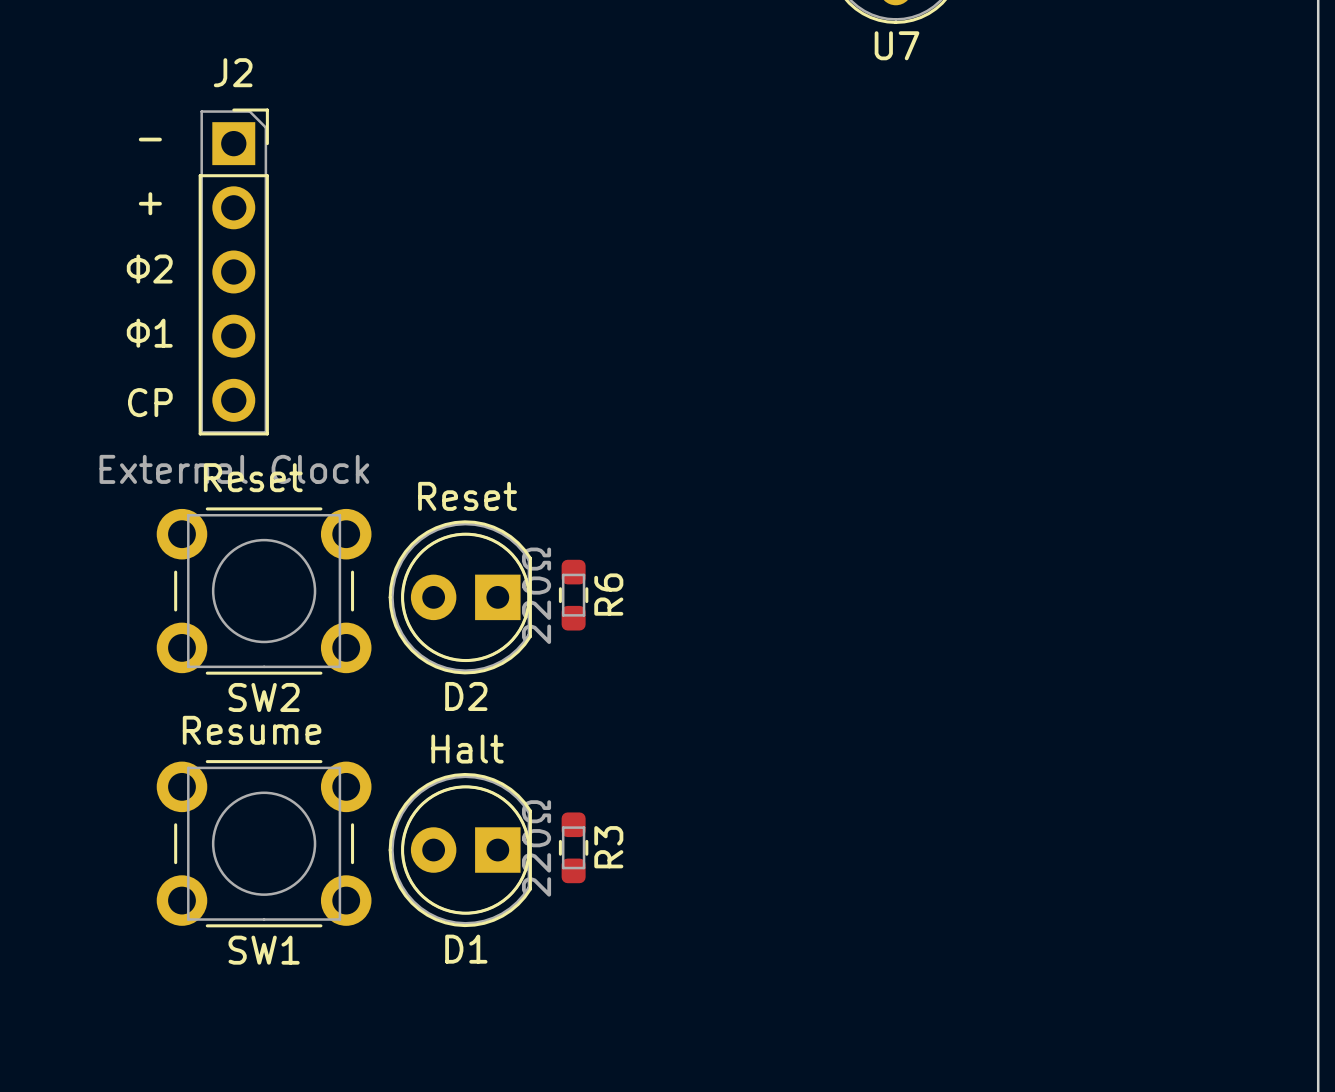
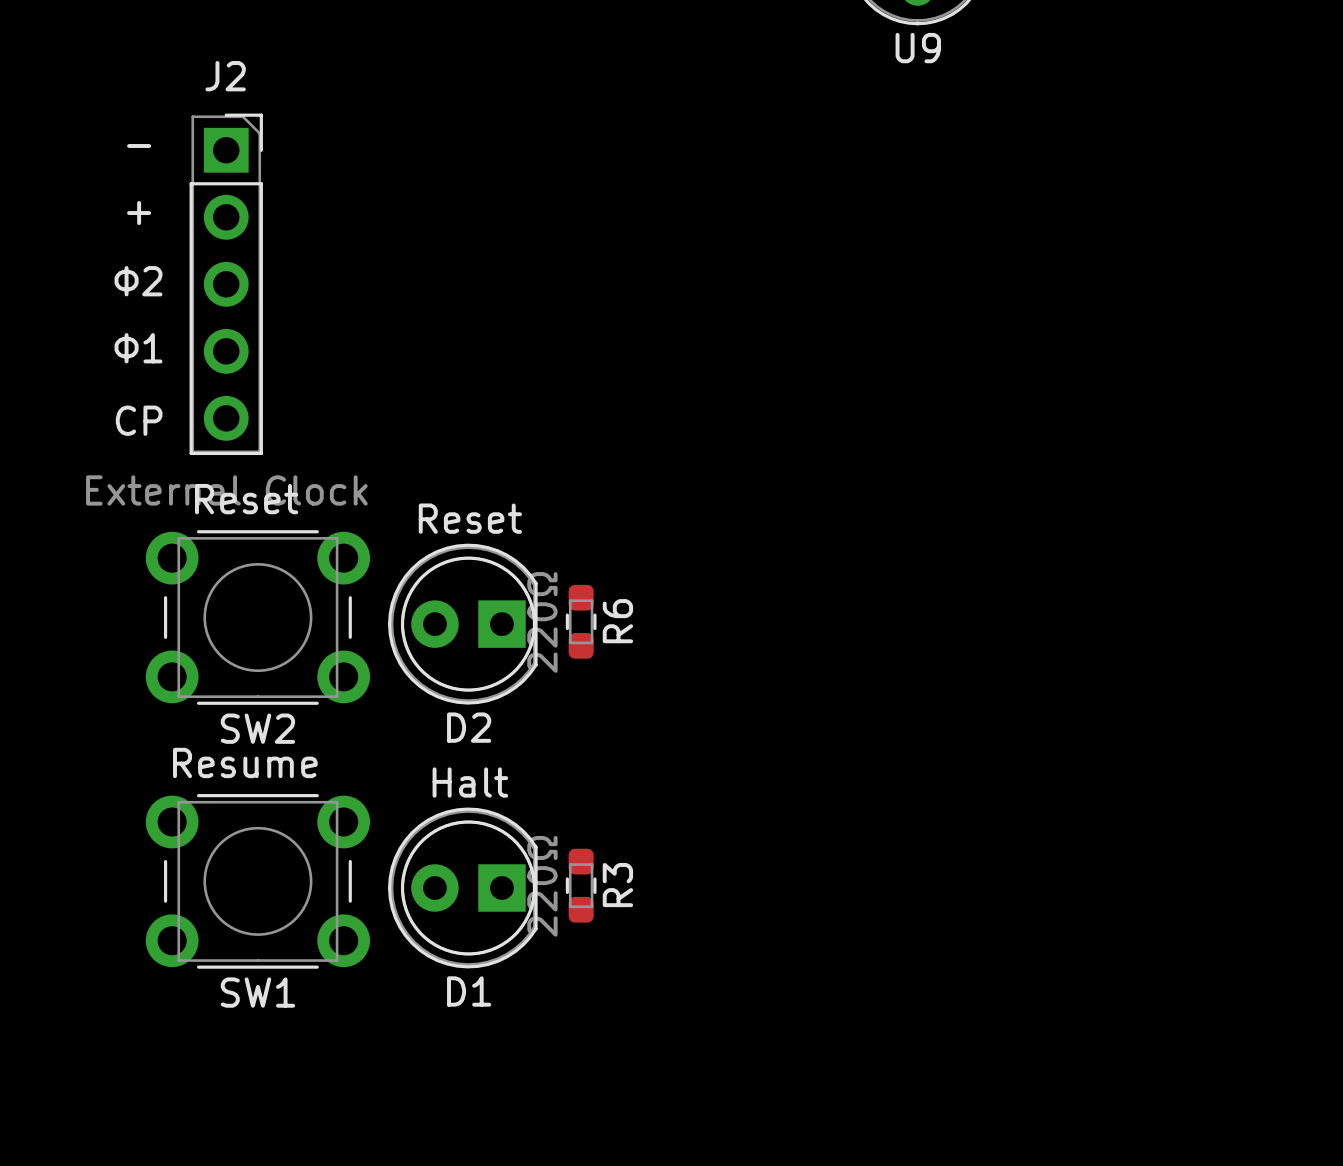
U7 name: U7 (897, 45) -> U9 (918, 48)

